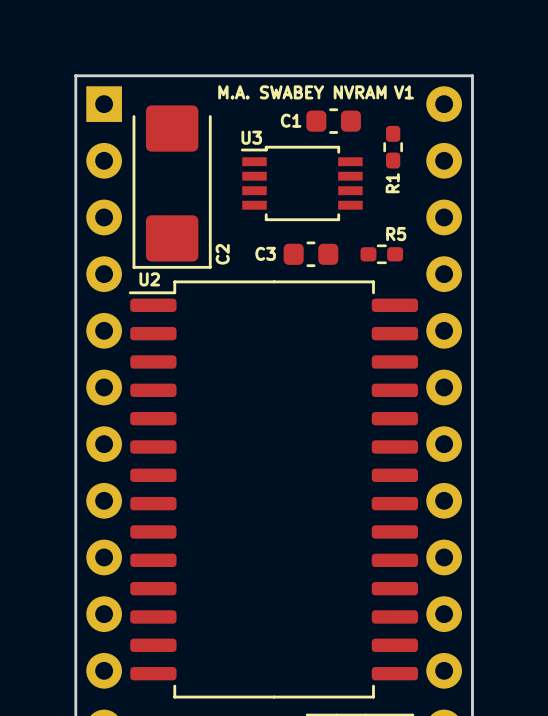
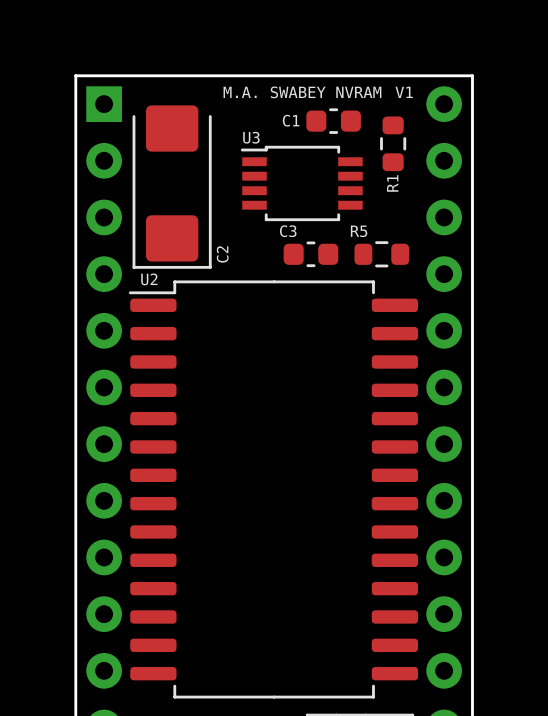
R1 footprint: [383, 125, 403, 169] -> [380, 116, 407, 172]
R5 name position: R5 (396, 234) -> R5 (359, 231)
R5 footprint: [360, 244, 404, 265] -> [354, 241, 410, 268]
C3 name position: C3 (265, 253) -> C3 (288, 231)

